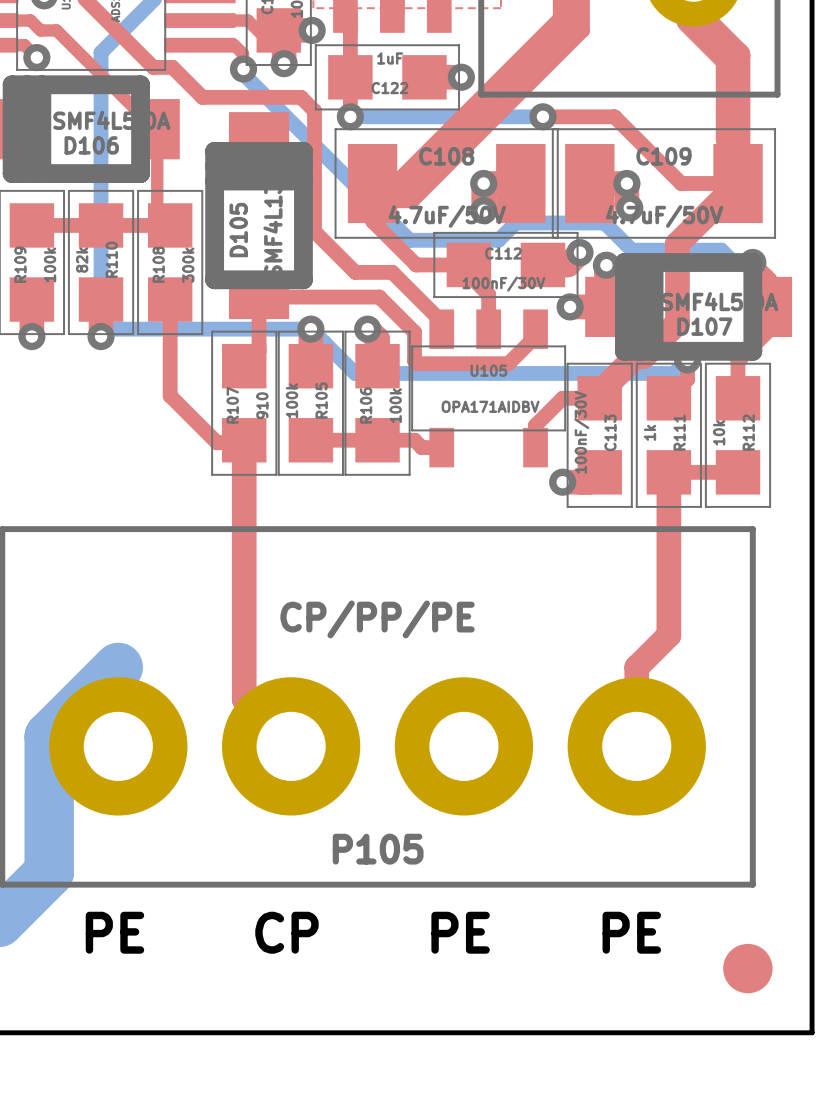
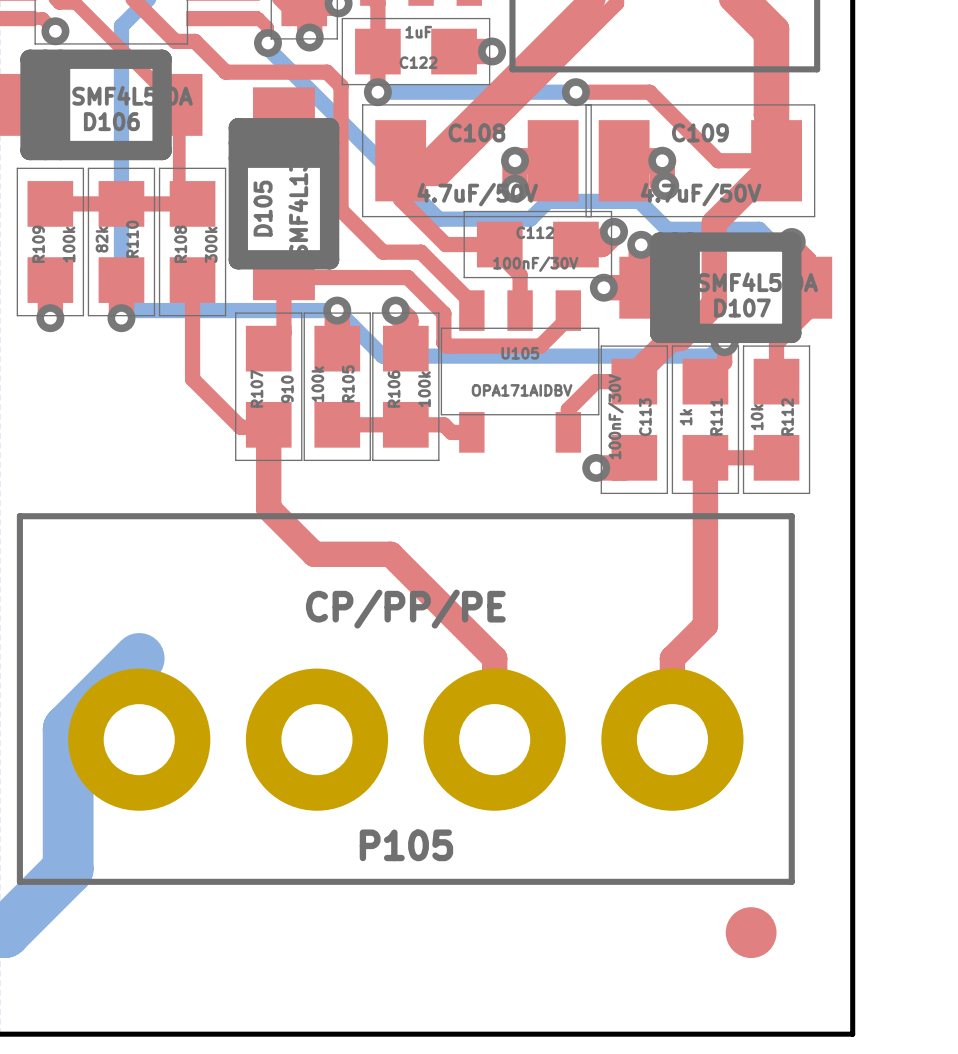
top track: (244, 521) (244, 699) (291, 746) -> (268, 508) (314, 554) (390, 554) (494, 658) (494, 739)
text: PE CP PE PE (373, 932) -> none
part position: (747, 968) -> (751, 932)

